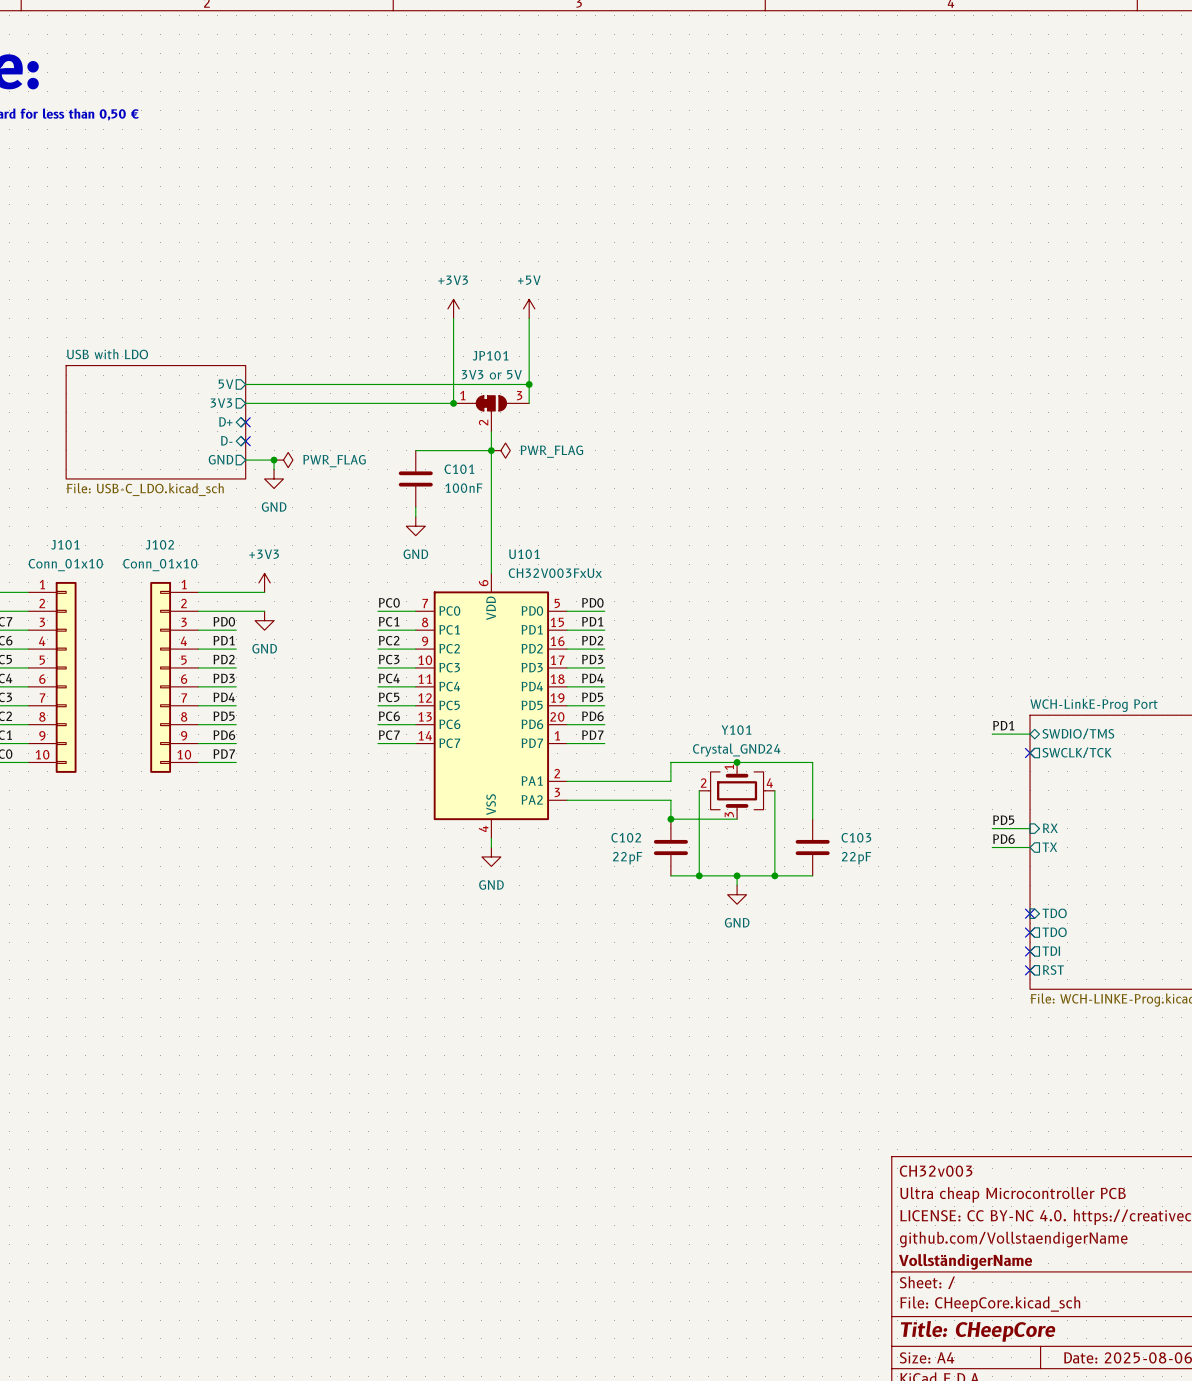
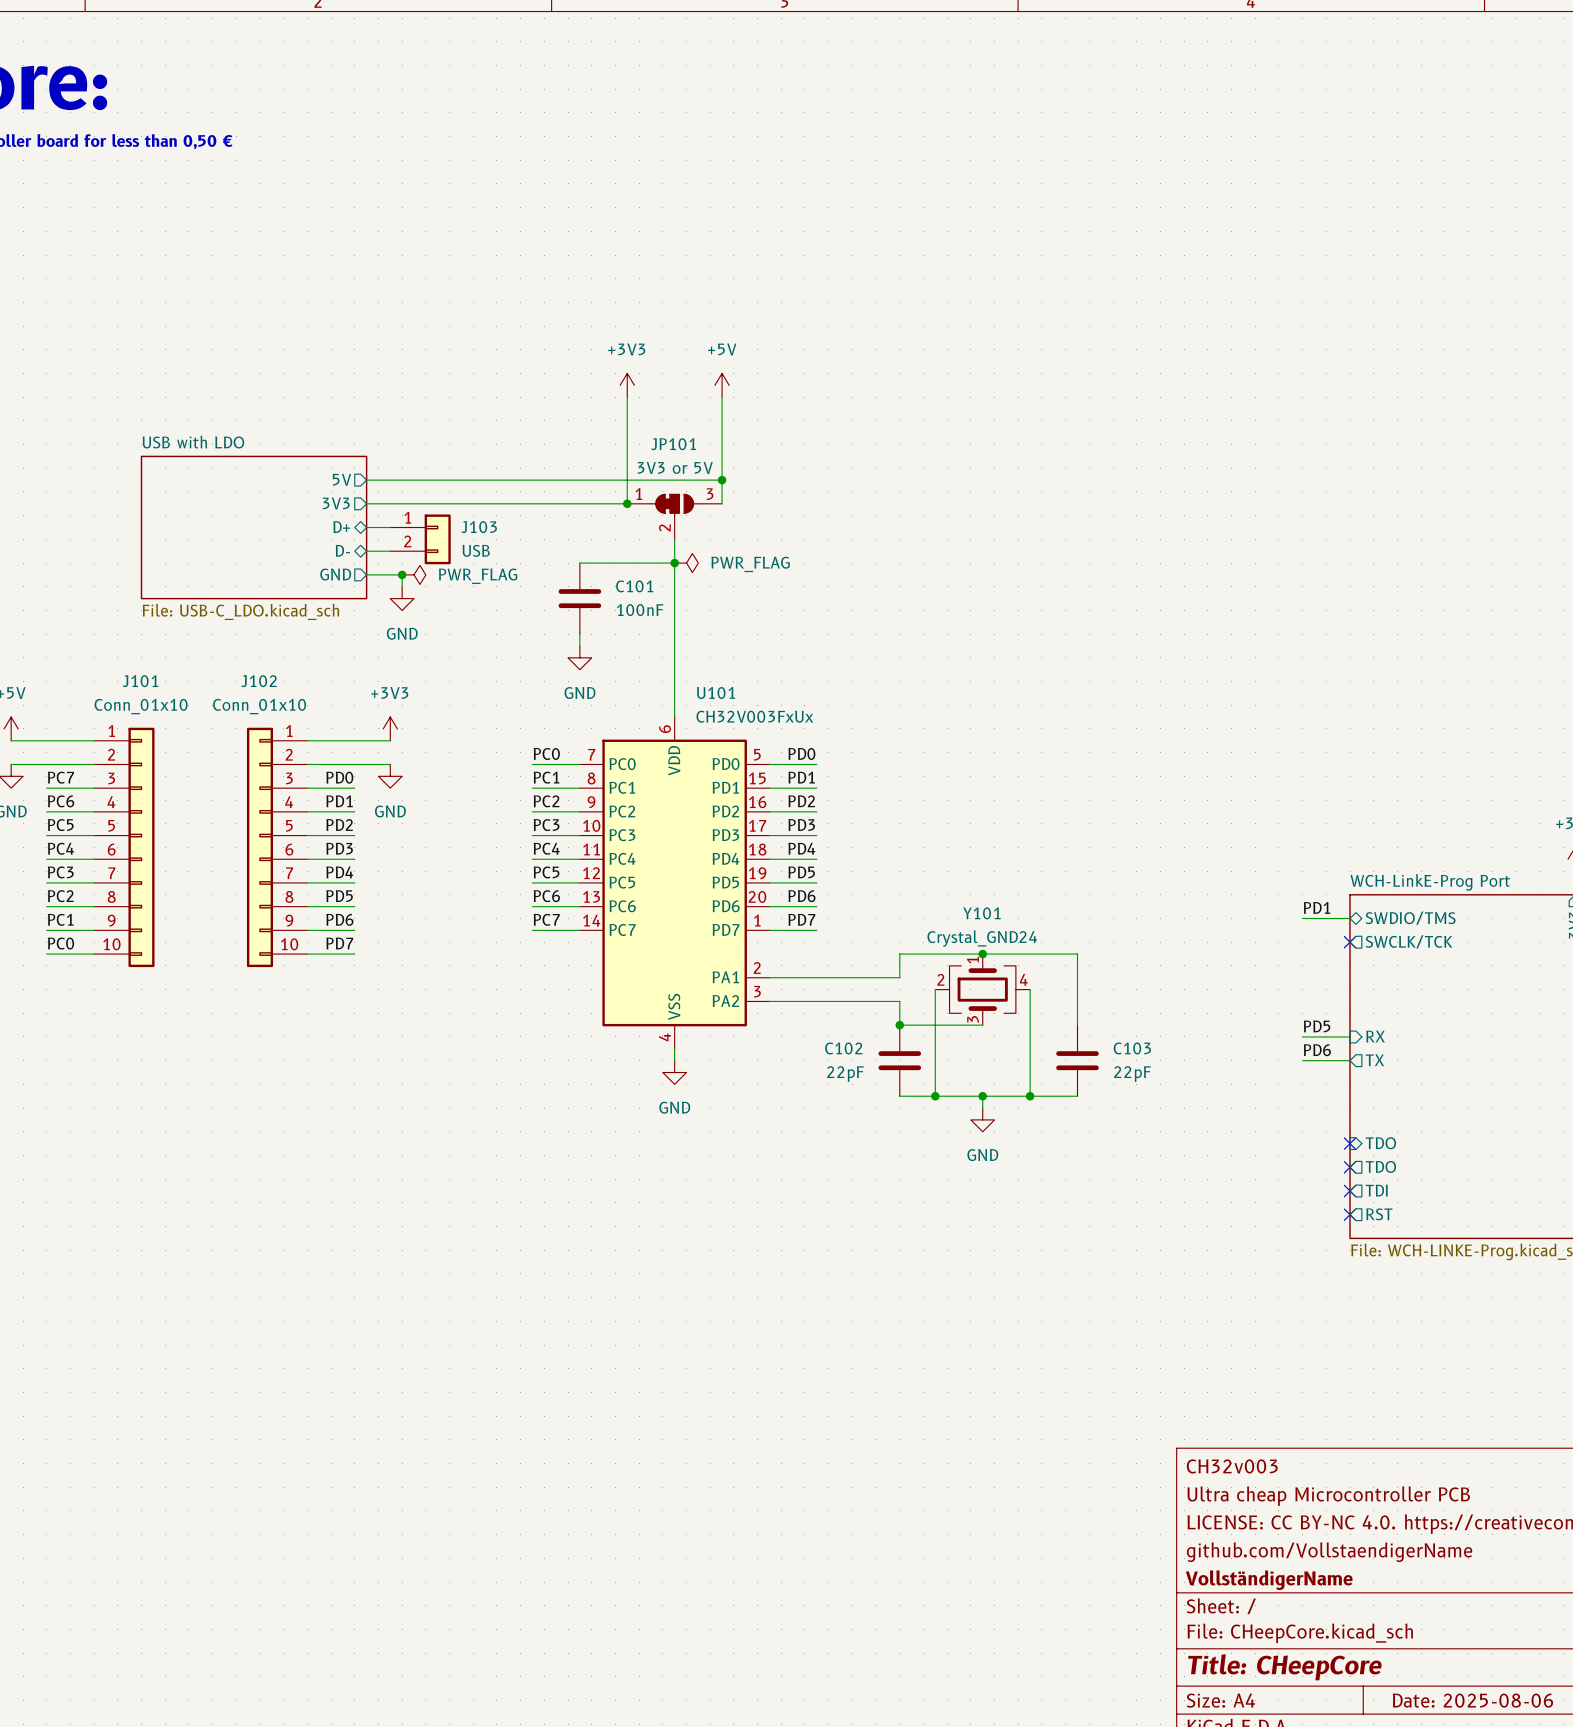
wire: none -> (366, 527) (390, 527)
no-connect mark: (245, 422) -> none
J103: none -> USB (420, 539)
wire: none -> (366, 551) (390, 551)
no-connect mark: (245, 441) -> none

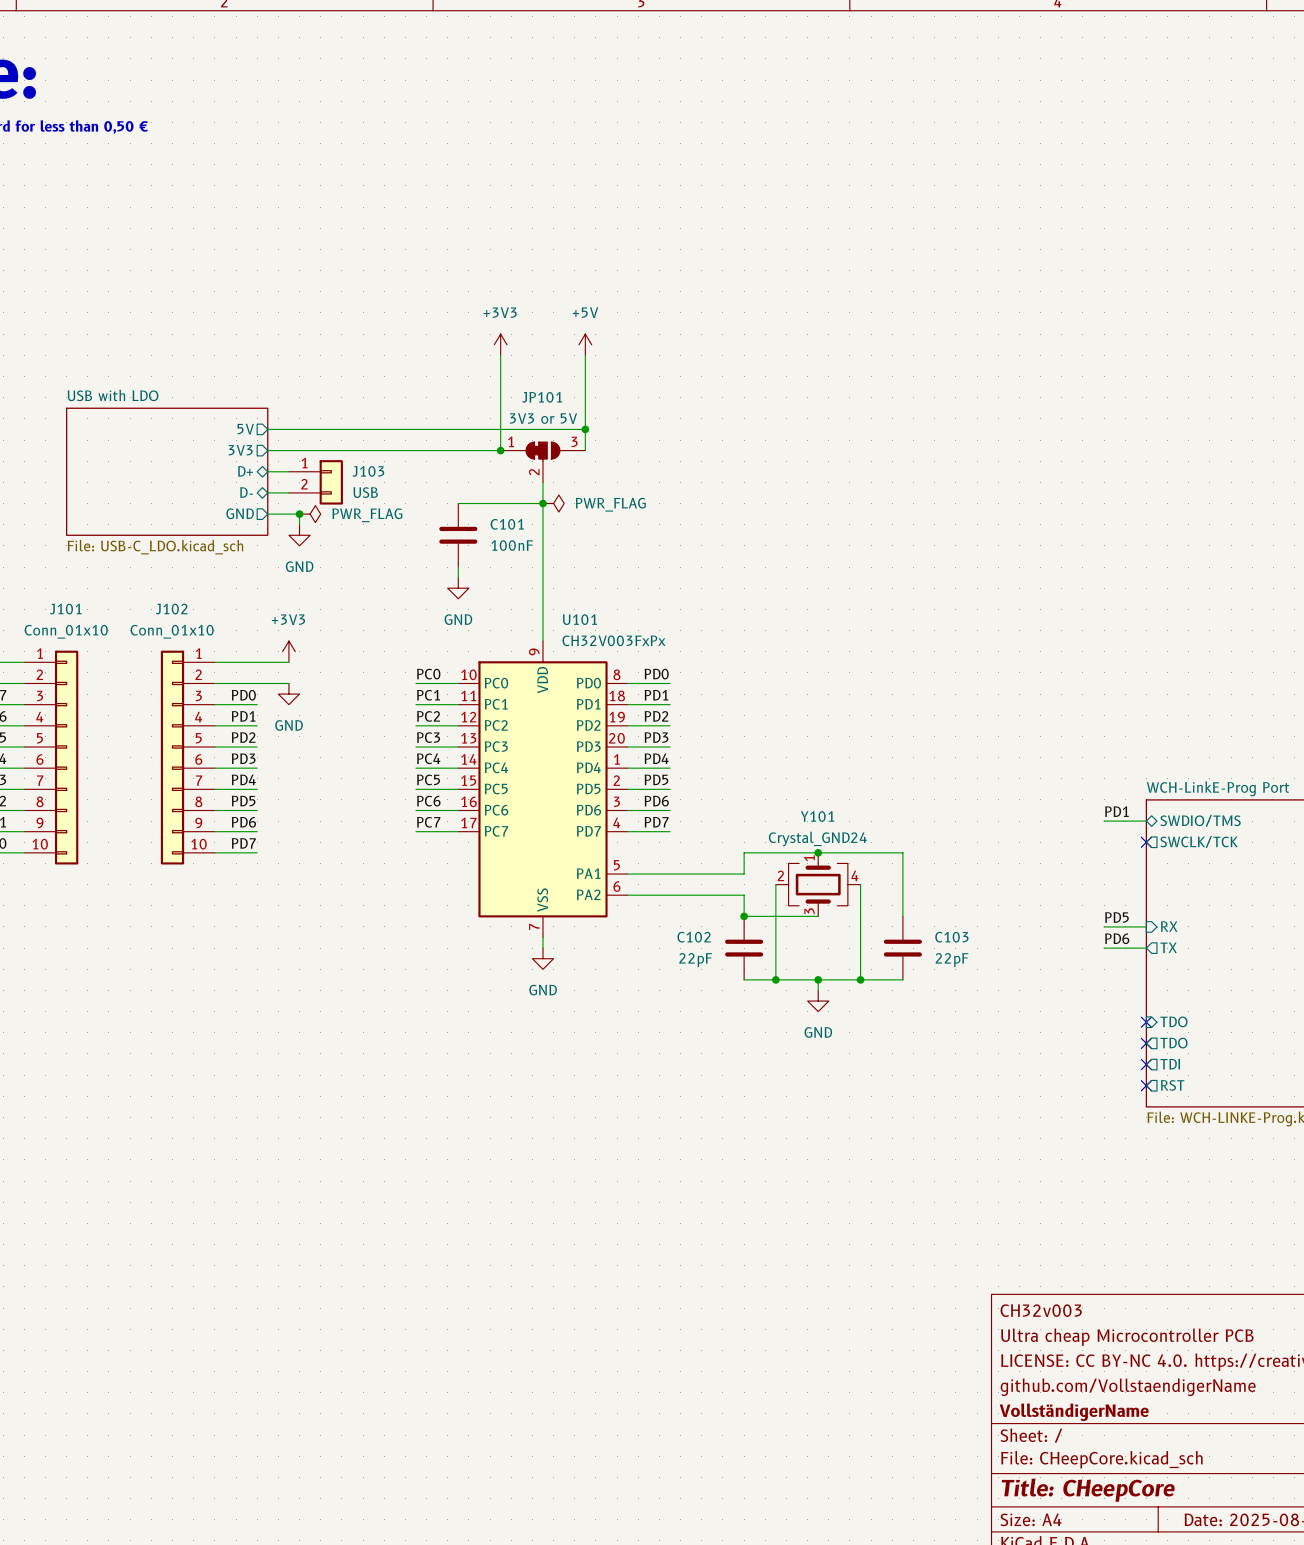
U101 value: CH32V003FxUx (754, 716) -> CH32V003FxPx (613, 640)
U101 symbol: [579, 717, 770, 1049] -> [458, 641, 628, 938]

